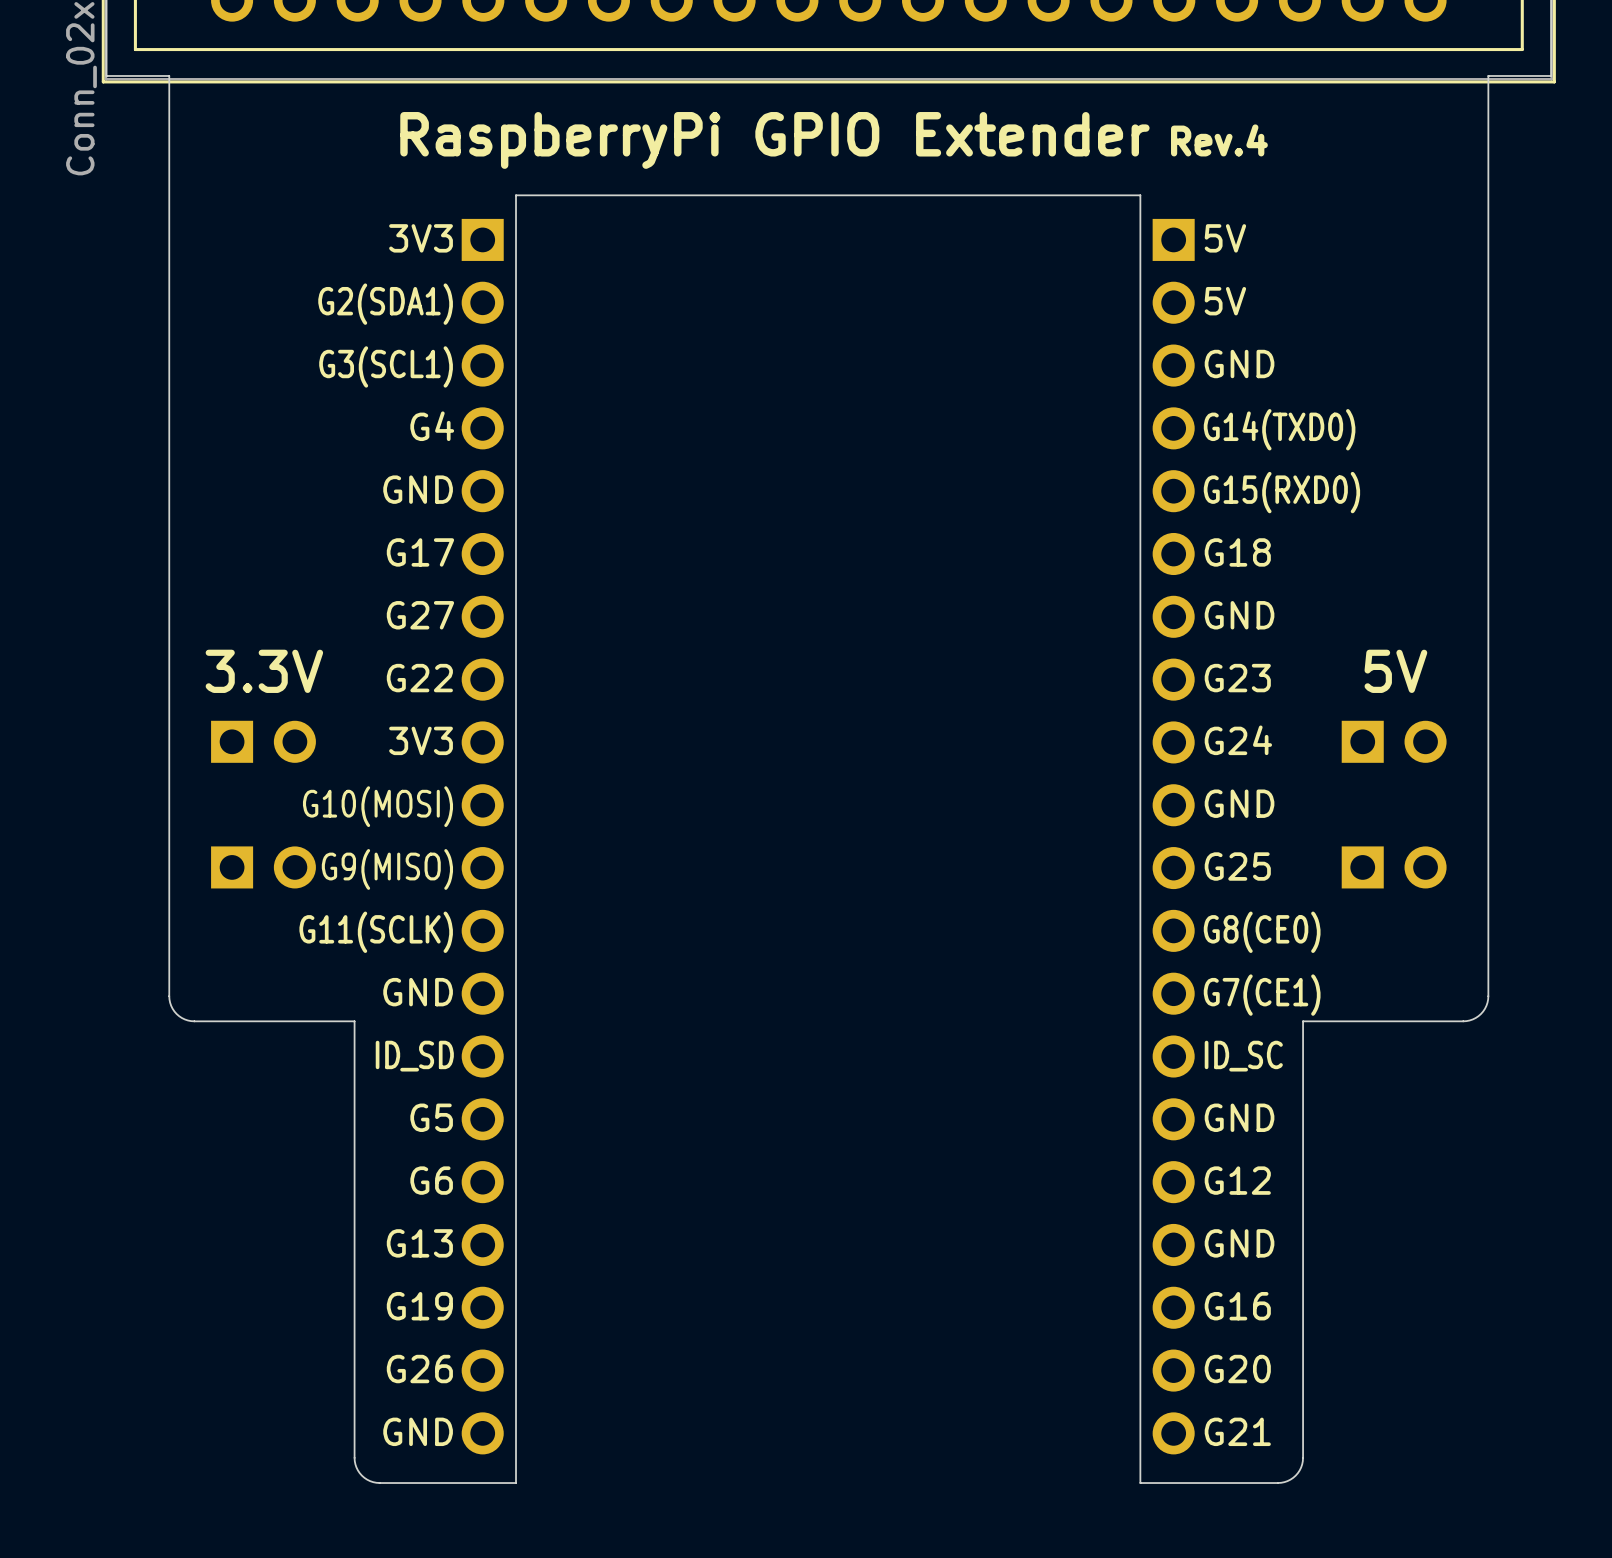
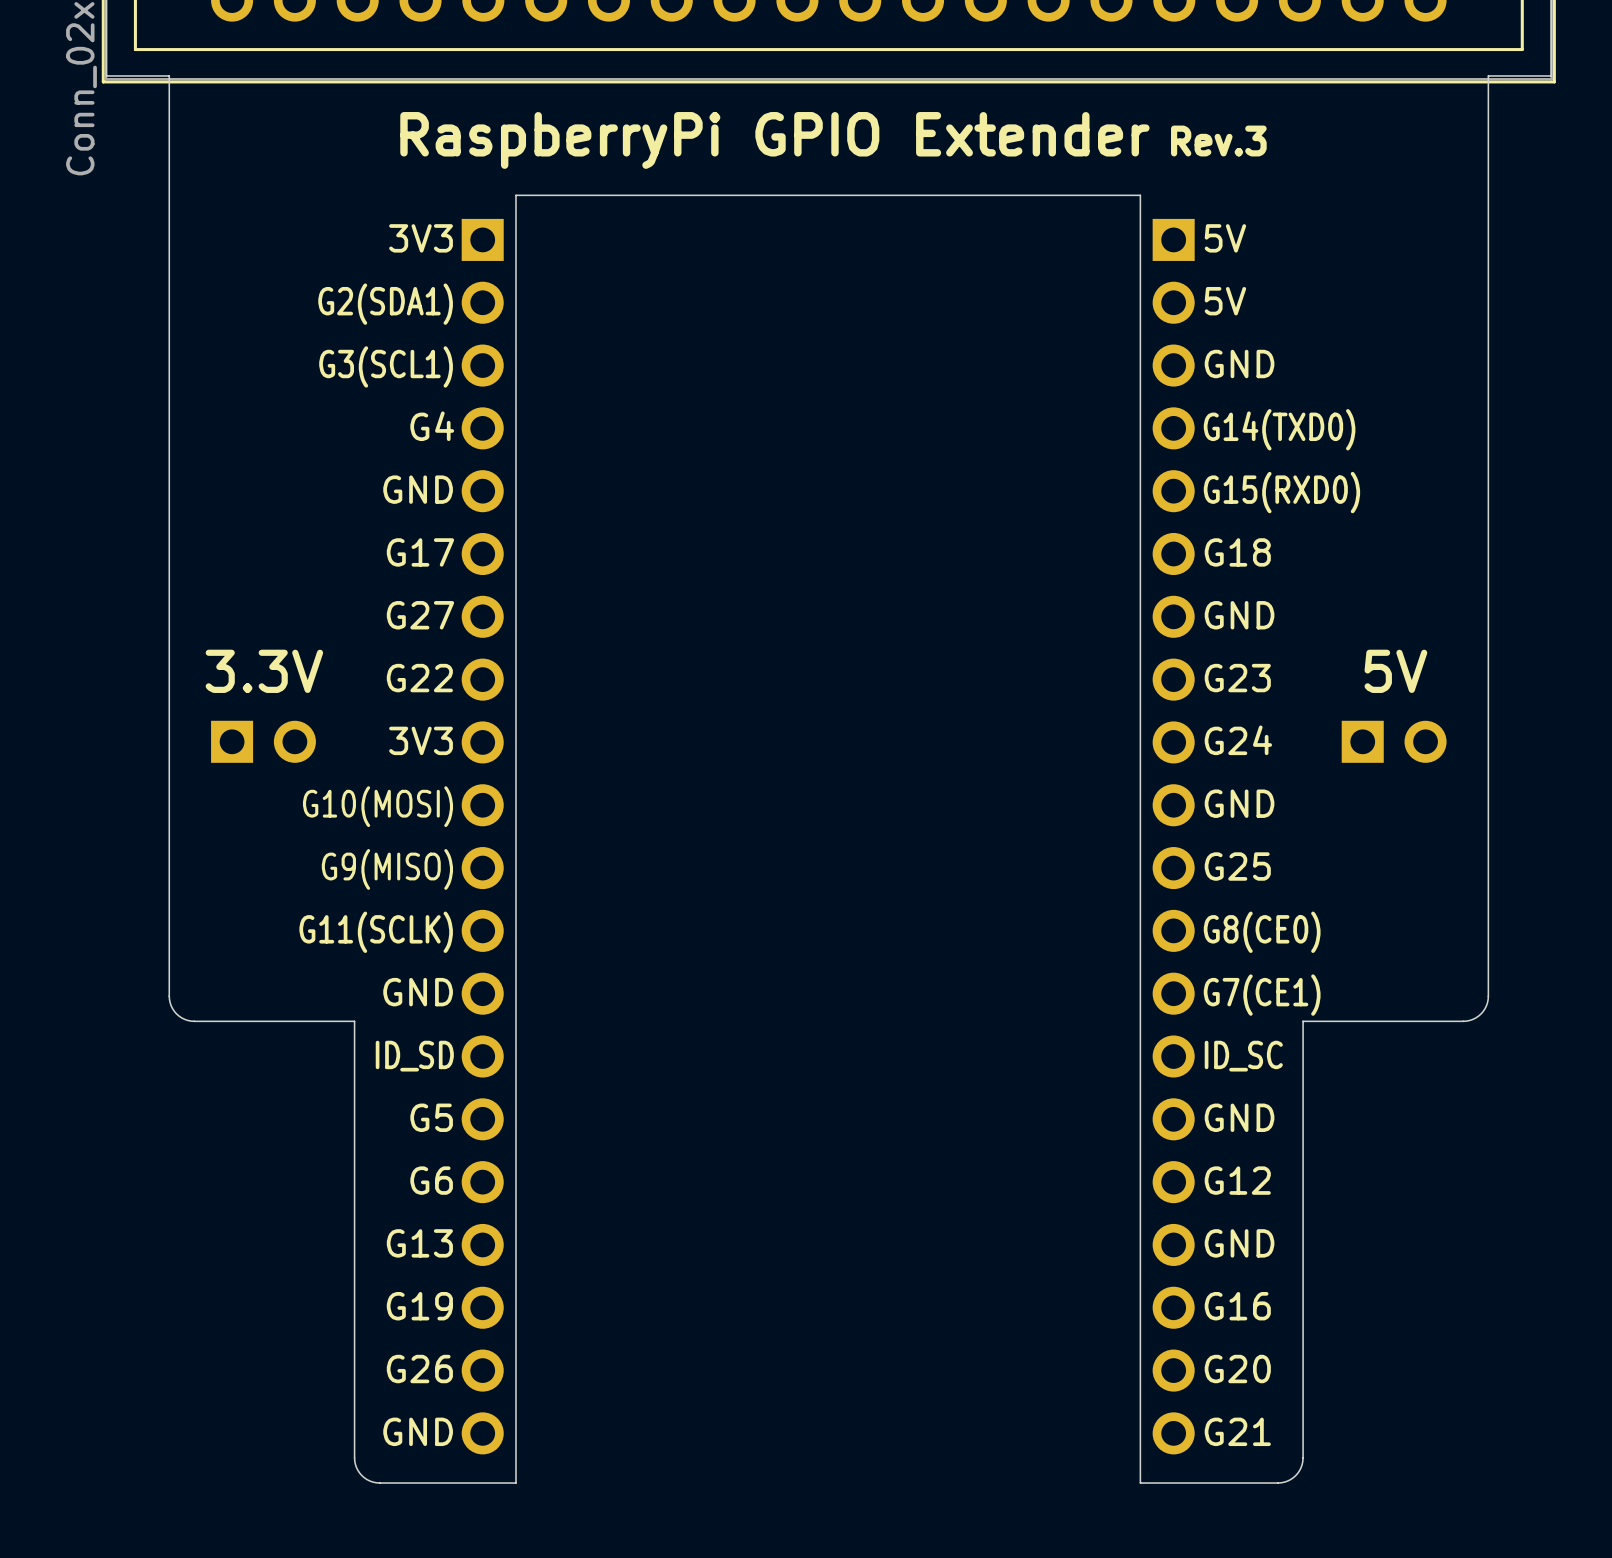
text: Rev.4 (1219, 140) -> Rev.3 (1218, 141)
part: (263, 867) -> none
part: (1394, 867) -> none

